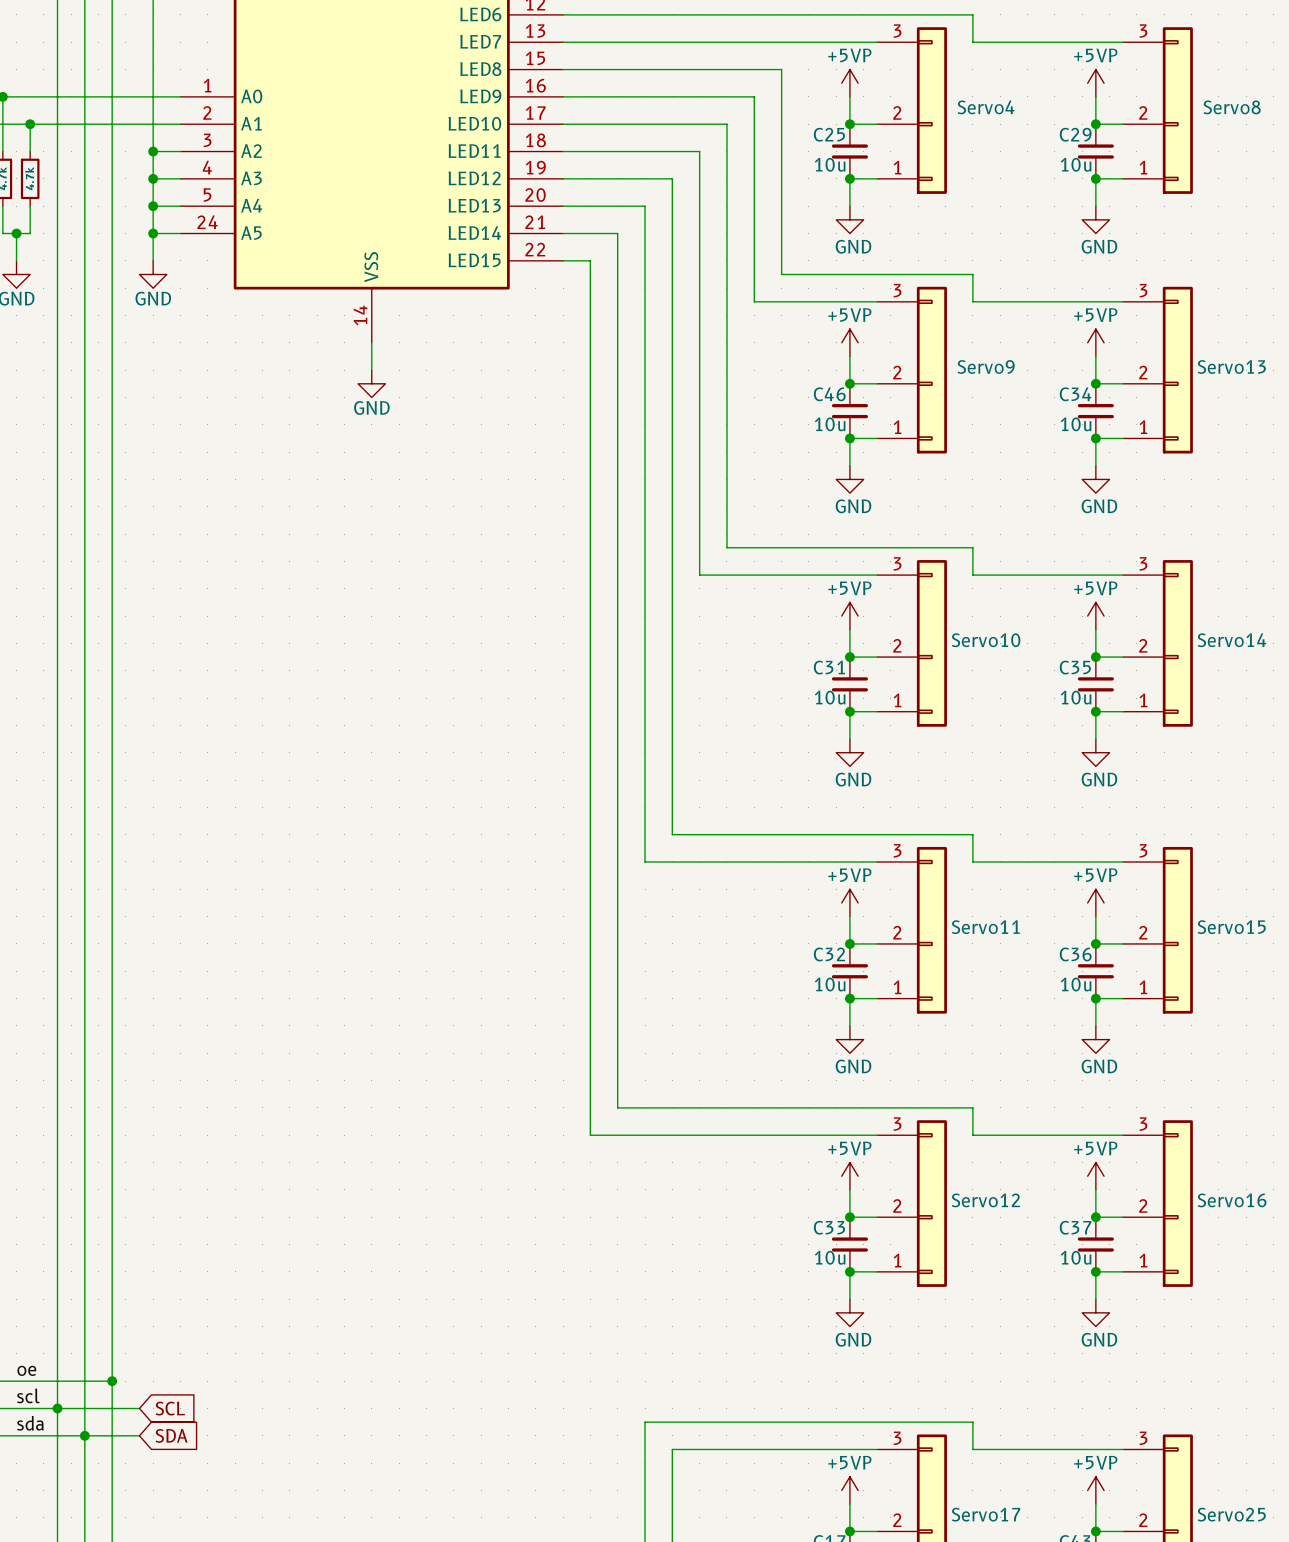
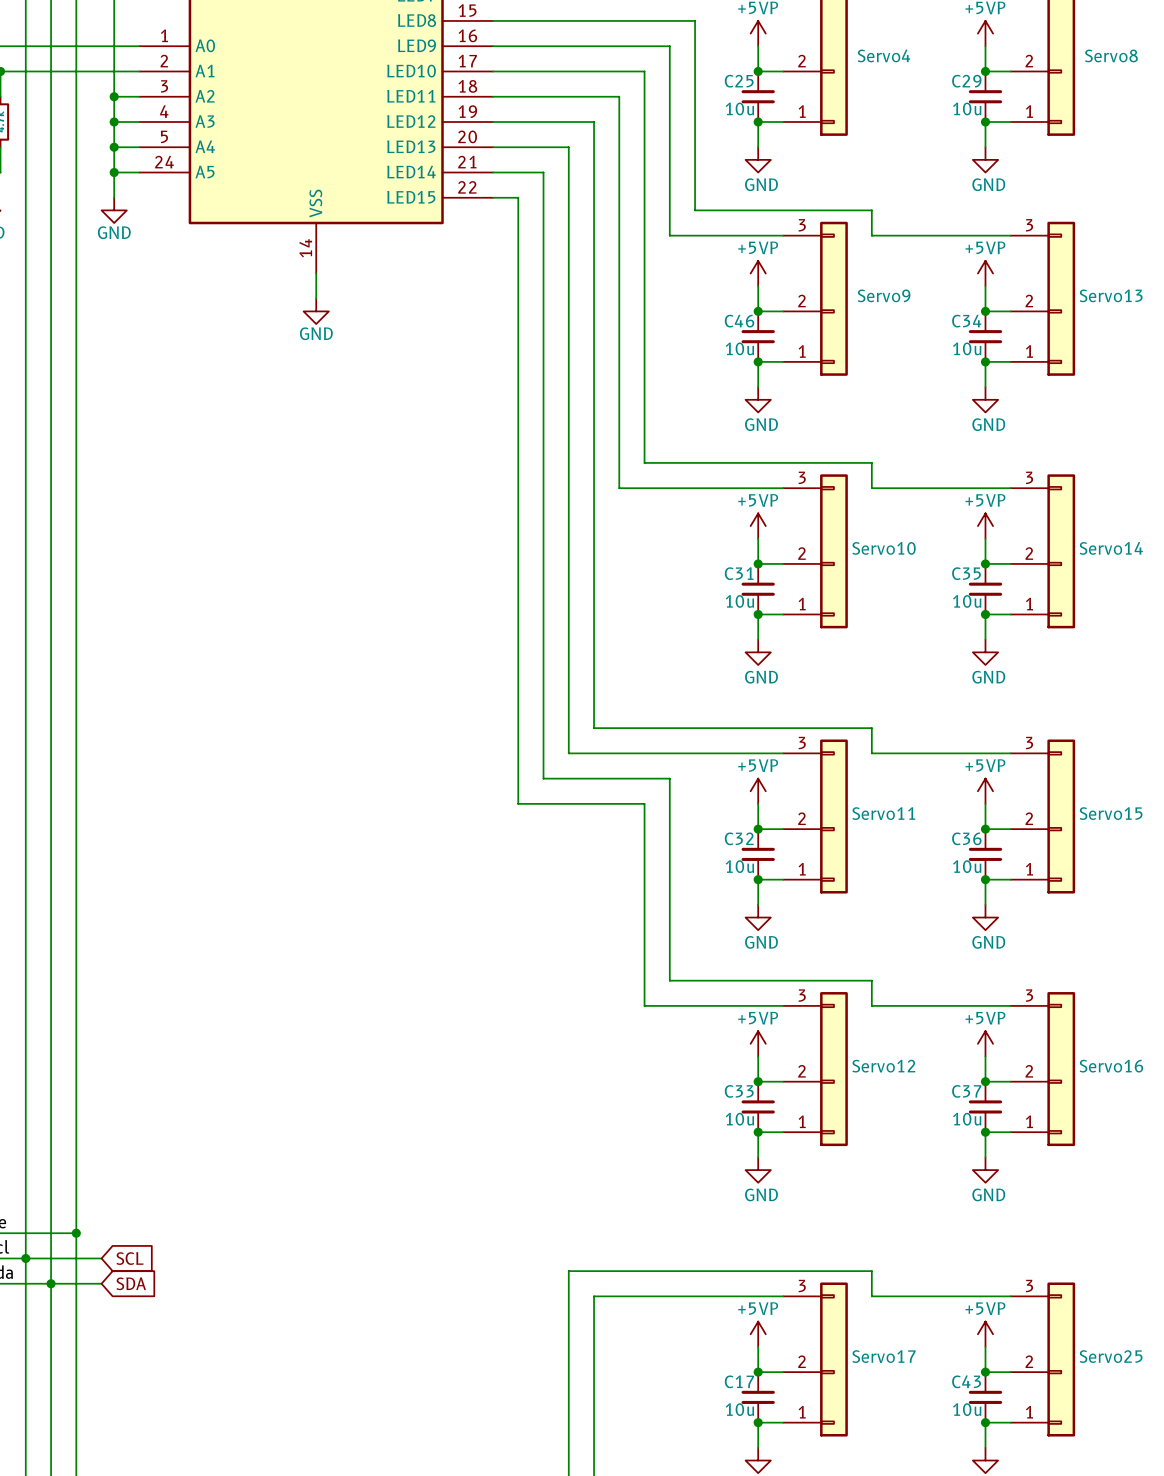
wire: (617, 889) (617, 1107) (754, 1107) -> (543, 778) (669, 778) (669, 980)
wire: (590, 916) (590, 1135) (726, 1135) -> (518, 803) (644, 803) (644, 1005)

